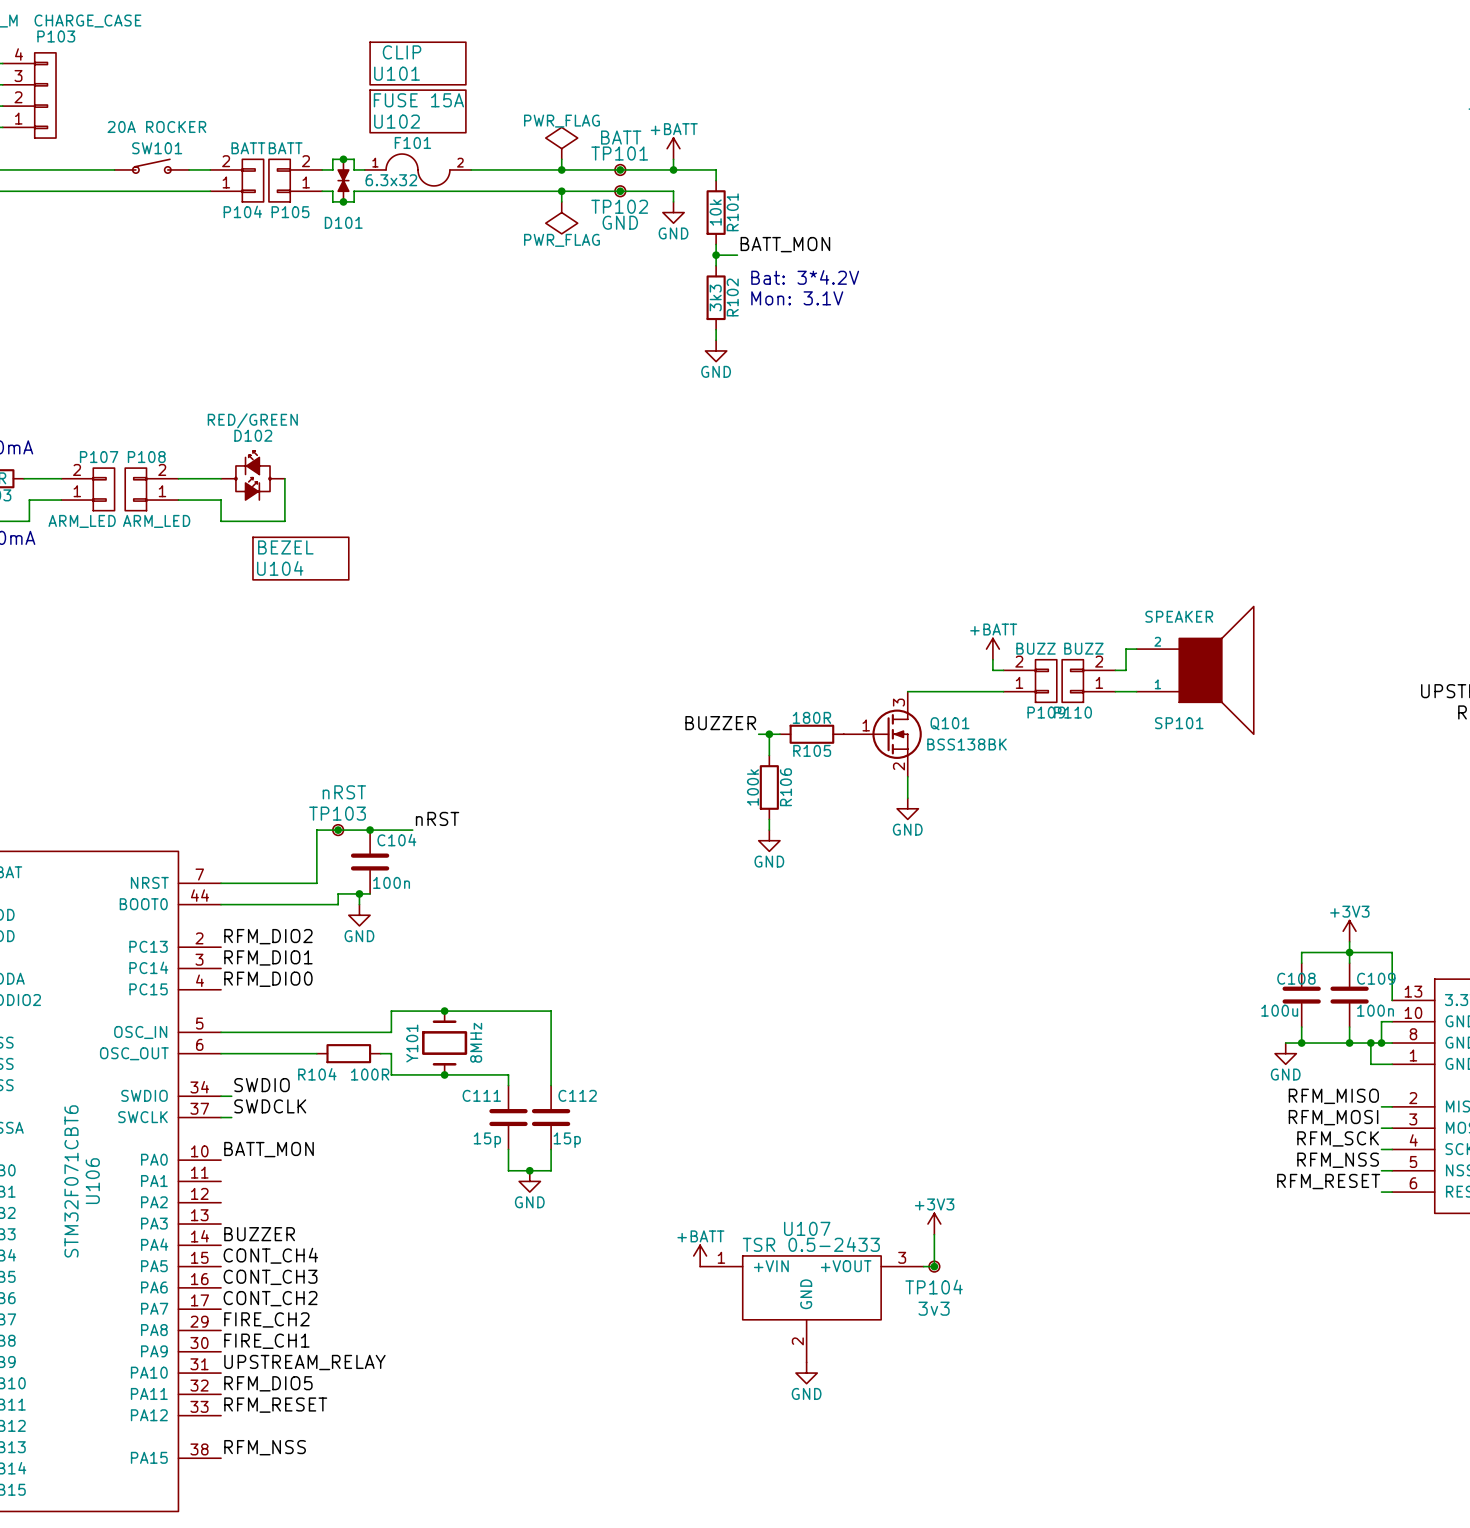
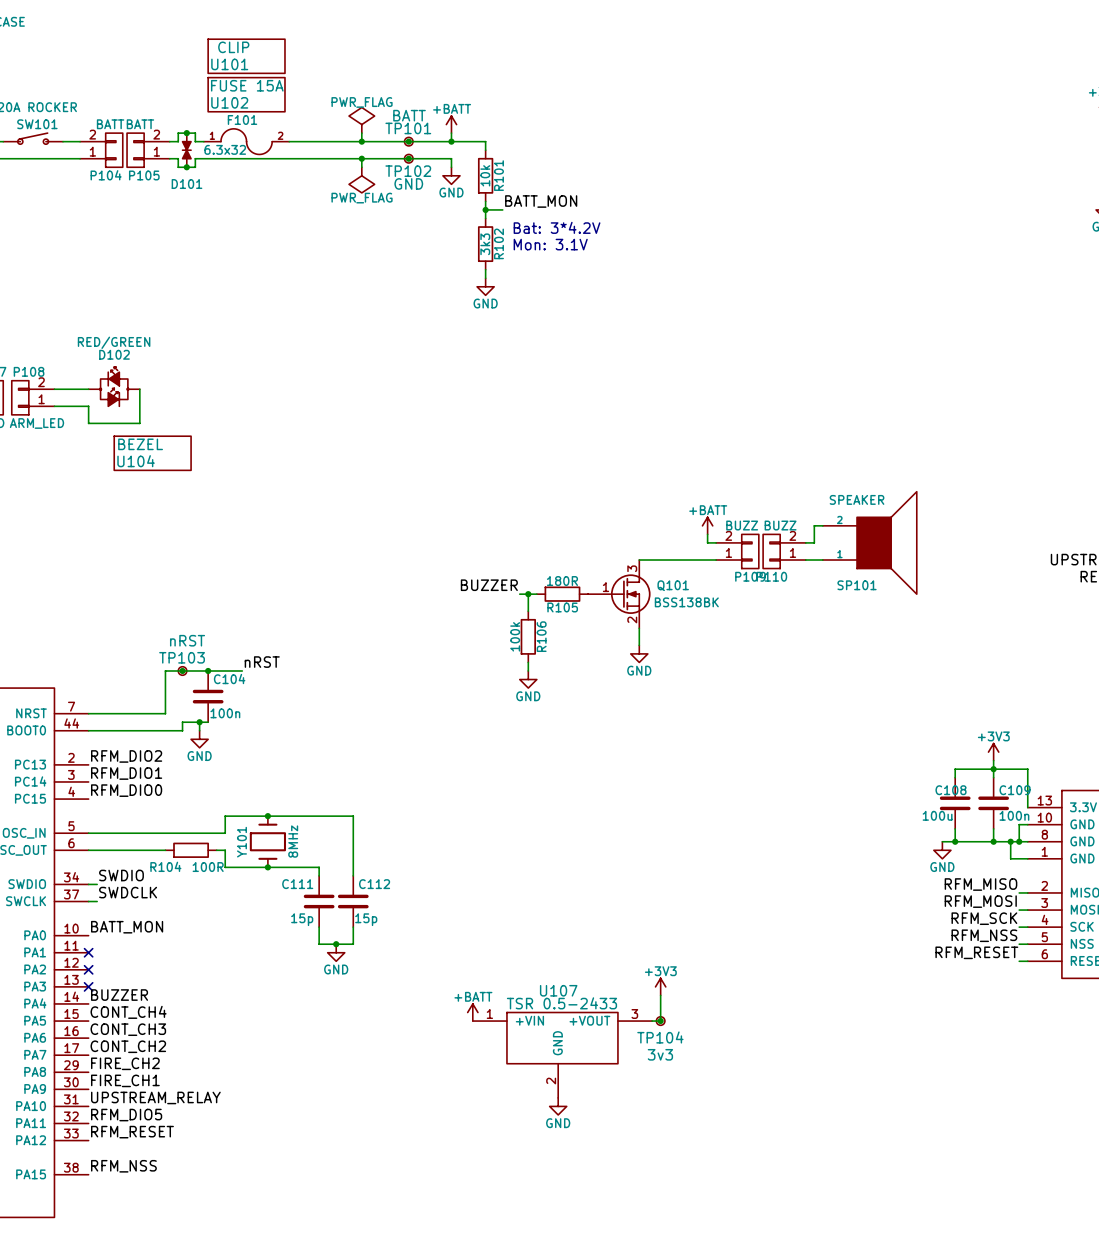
no-connect mark: none -> (88, 952)
no-connect mark: none -> (88, 969)
no-connect mark: none -> (88, 986)

